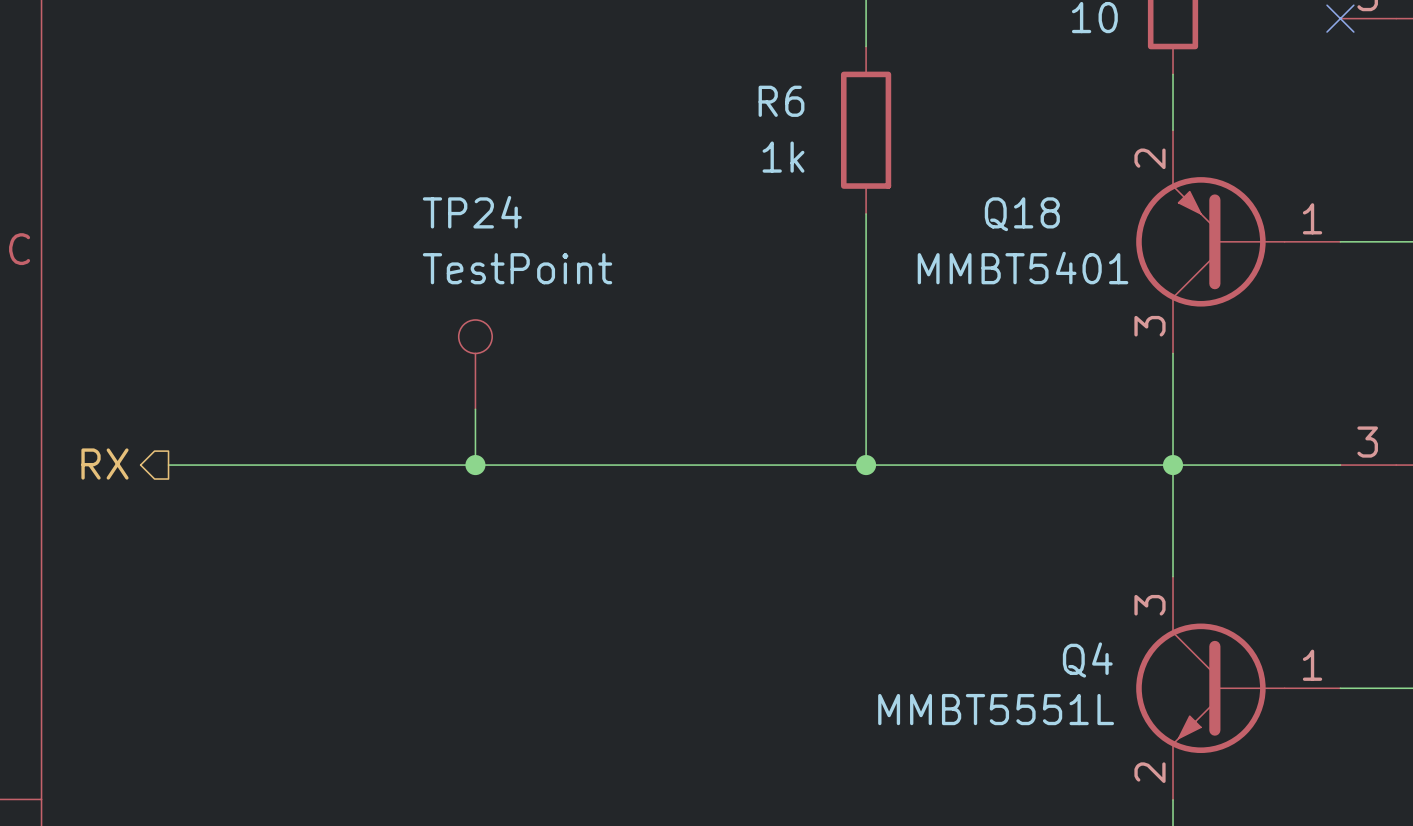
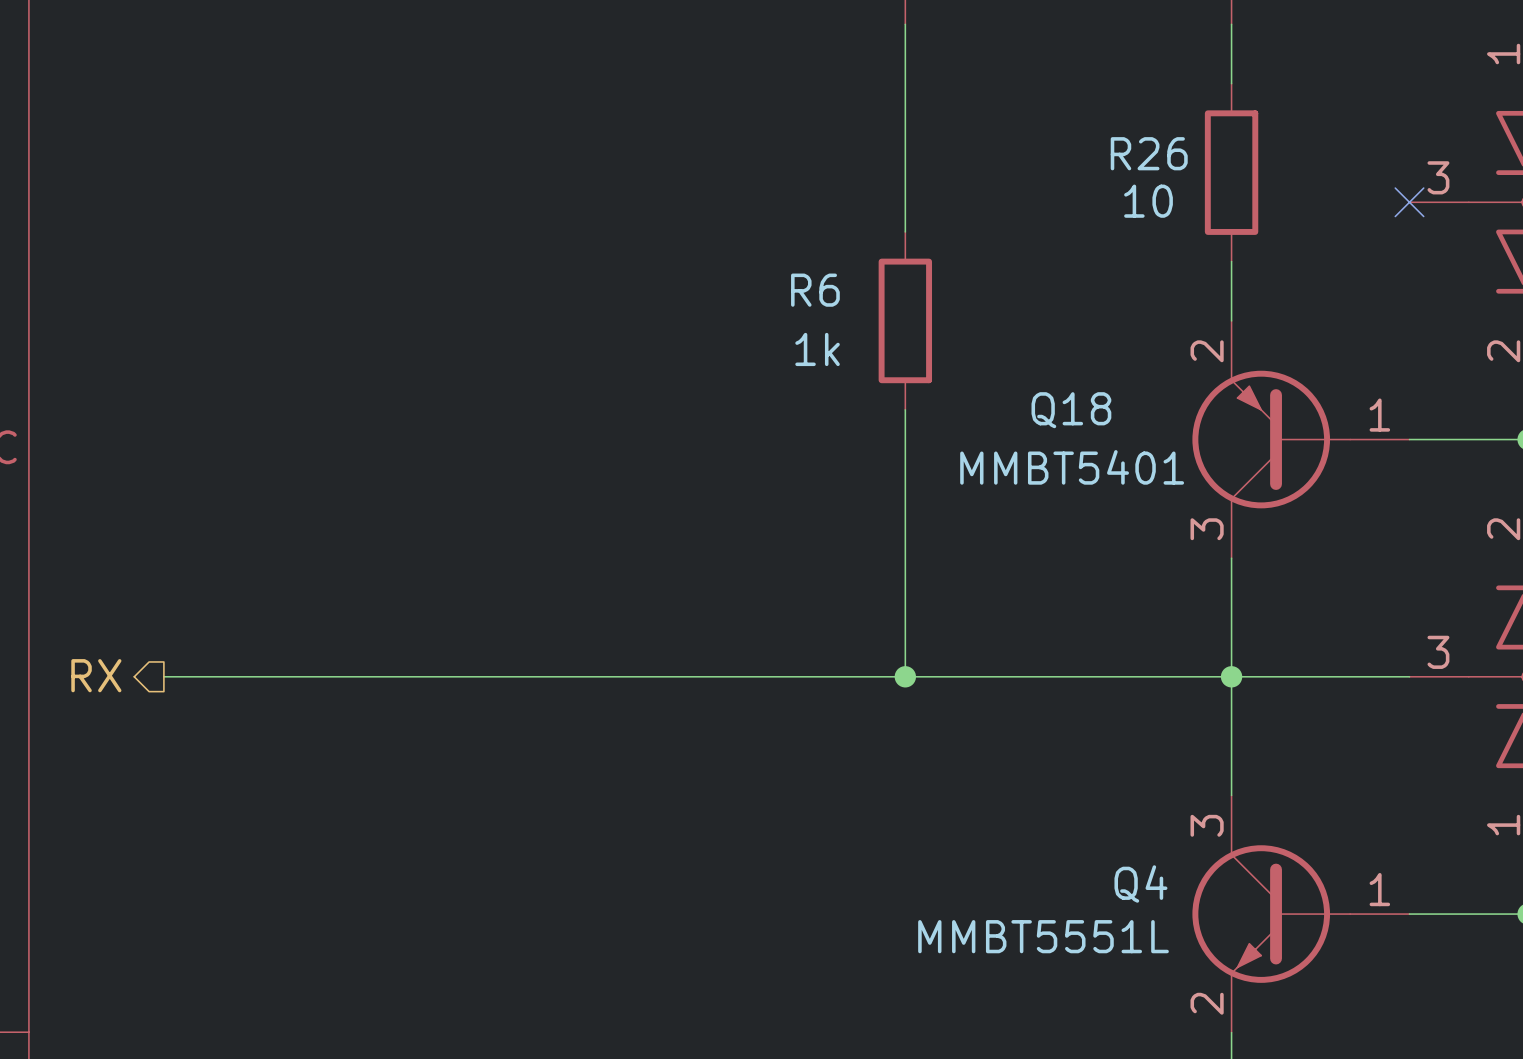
TP24: TestPoint (475, 364) -> none
wire: (475, 409) (475, 465) -> none
junction: (475, 465) -> none

